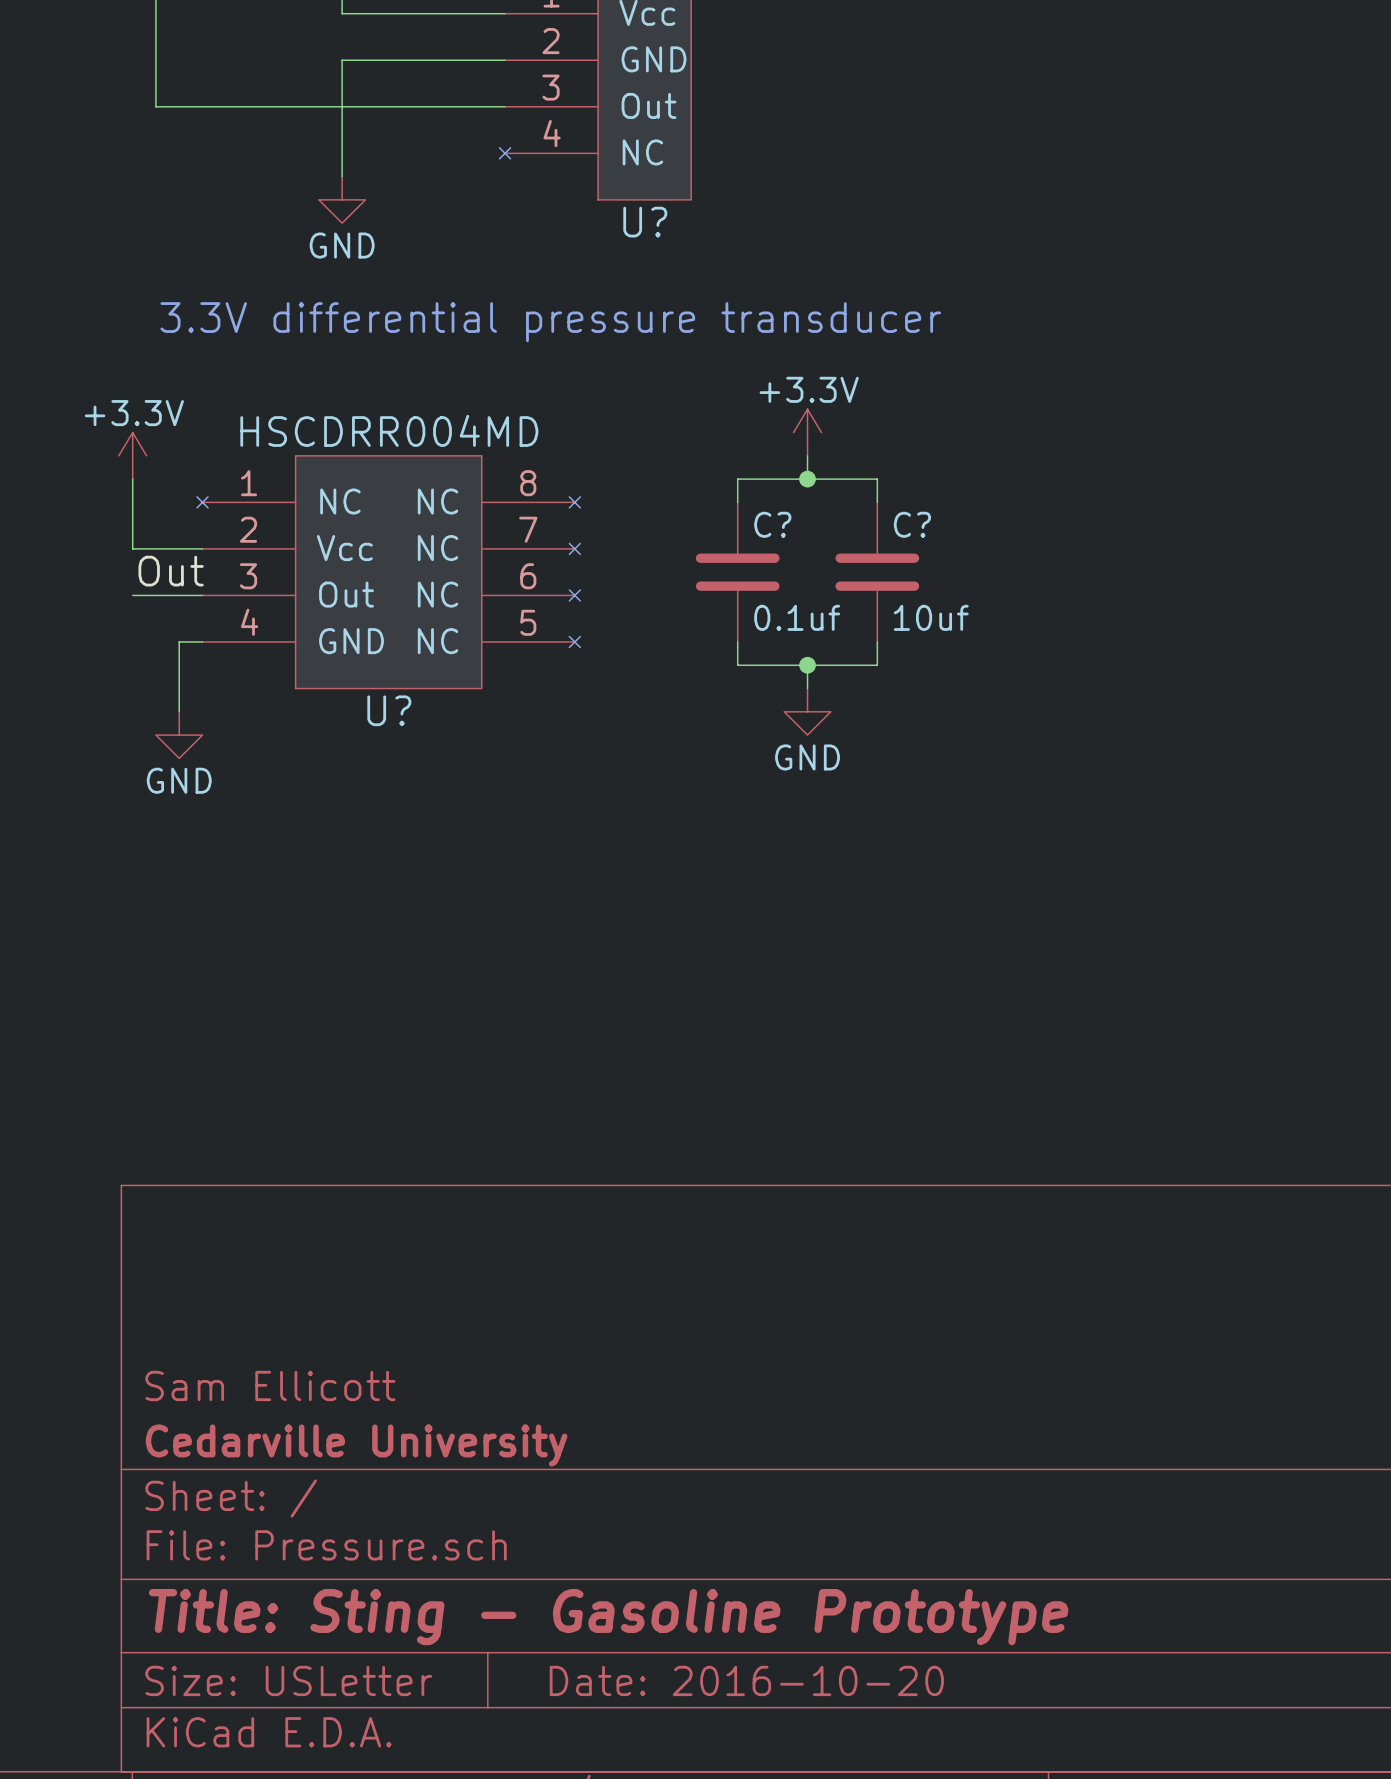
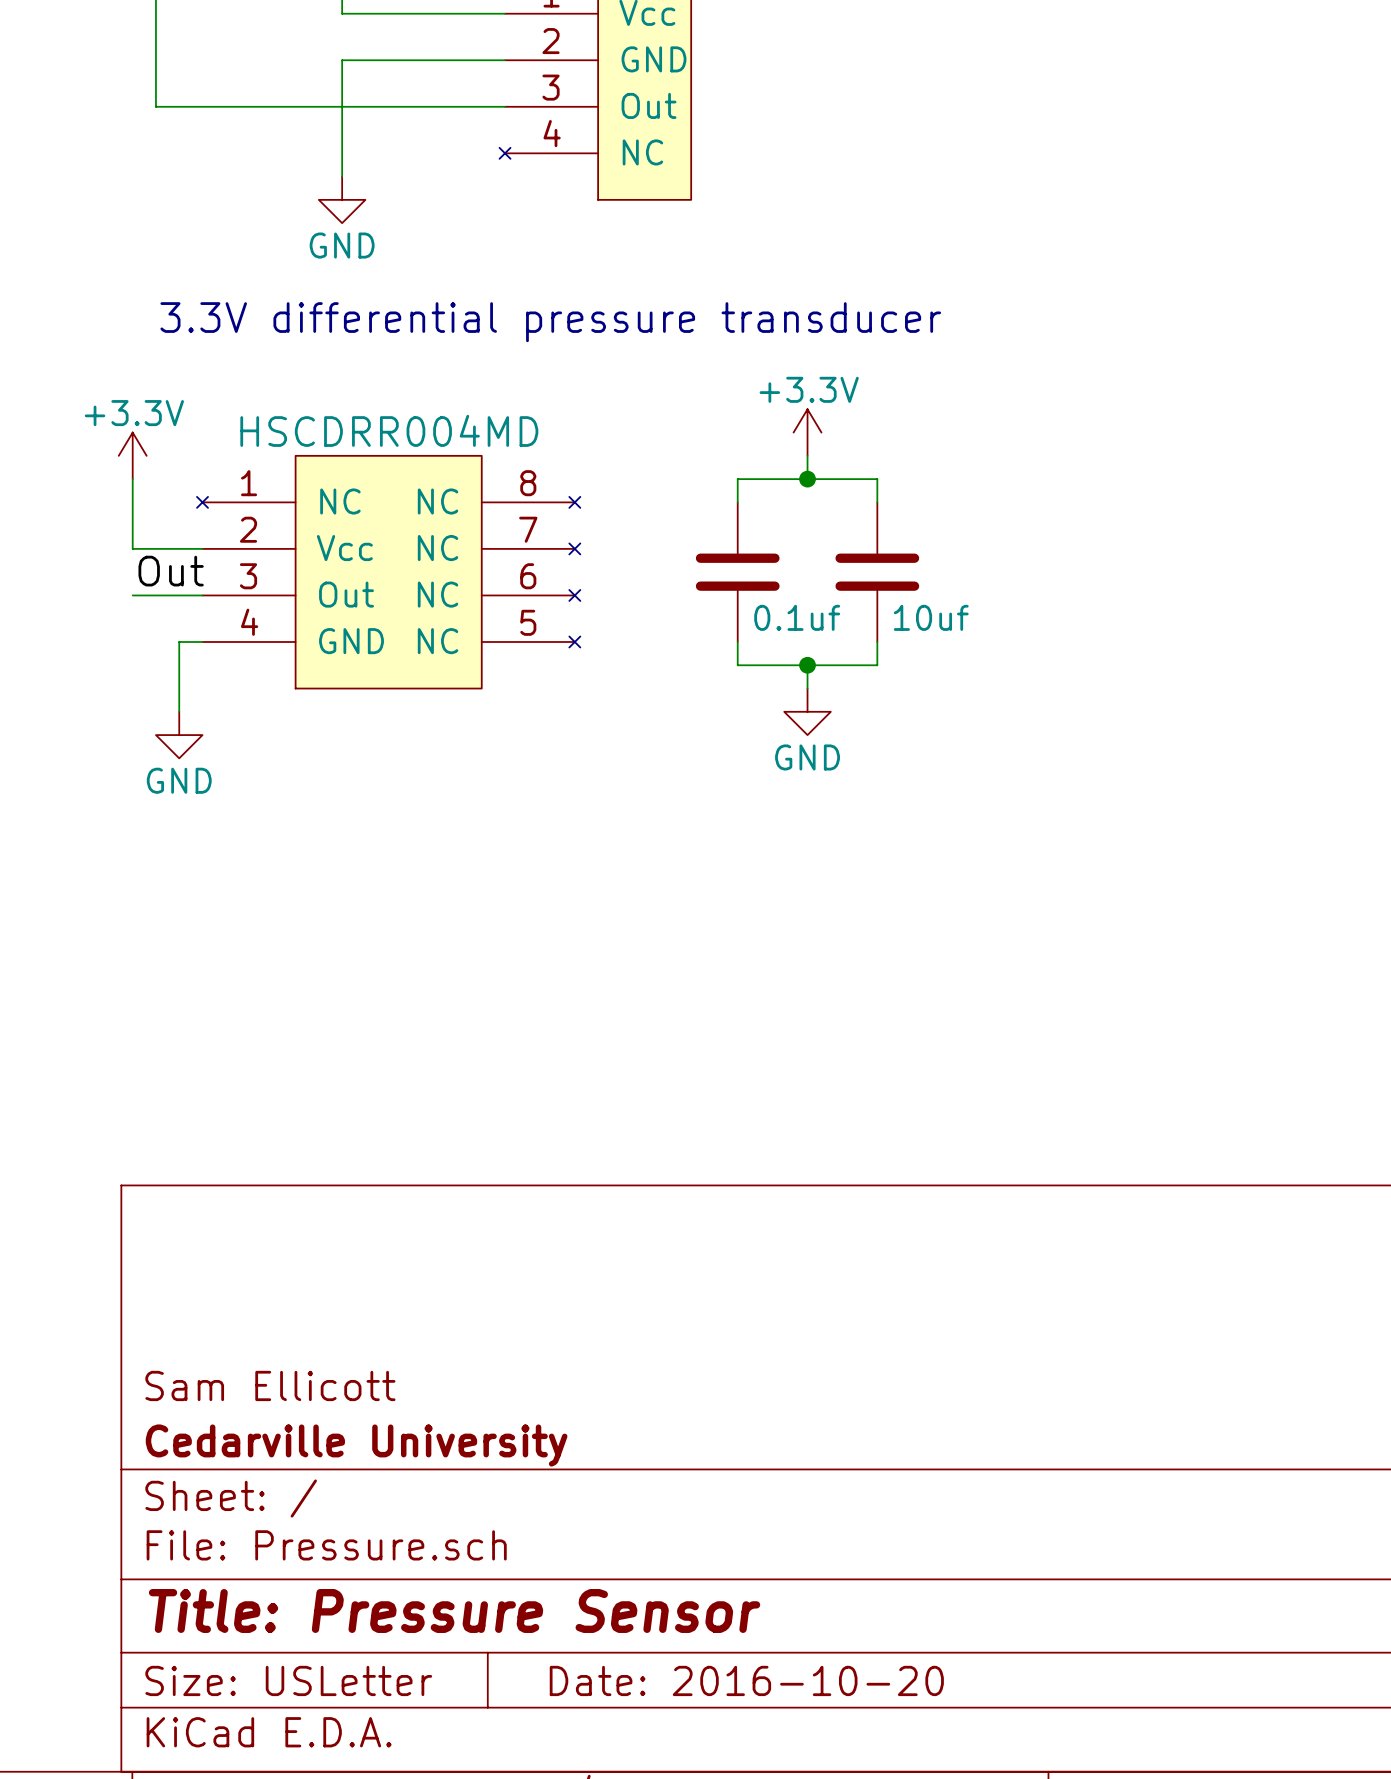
U? name: U? (645, 222) -> none
C? name: C? (772, 524) -> none
C? name: C? (912, 524) -> none
U? name: U? (389, 710) -> none
title block: Title: Sting - Gasoline Prototype (608, 1617) -> Title: Pressure Sensor (454, 1610)

